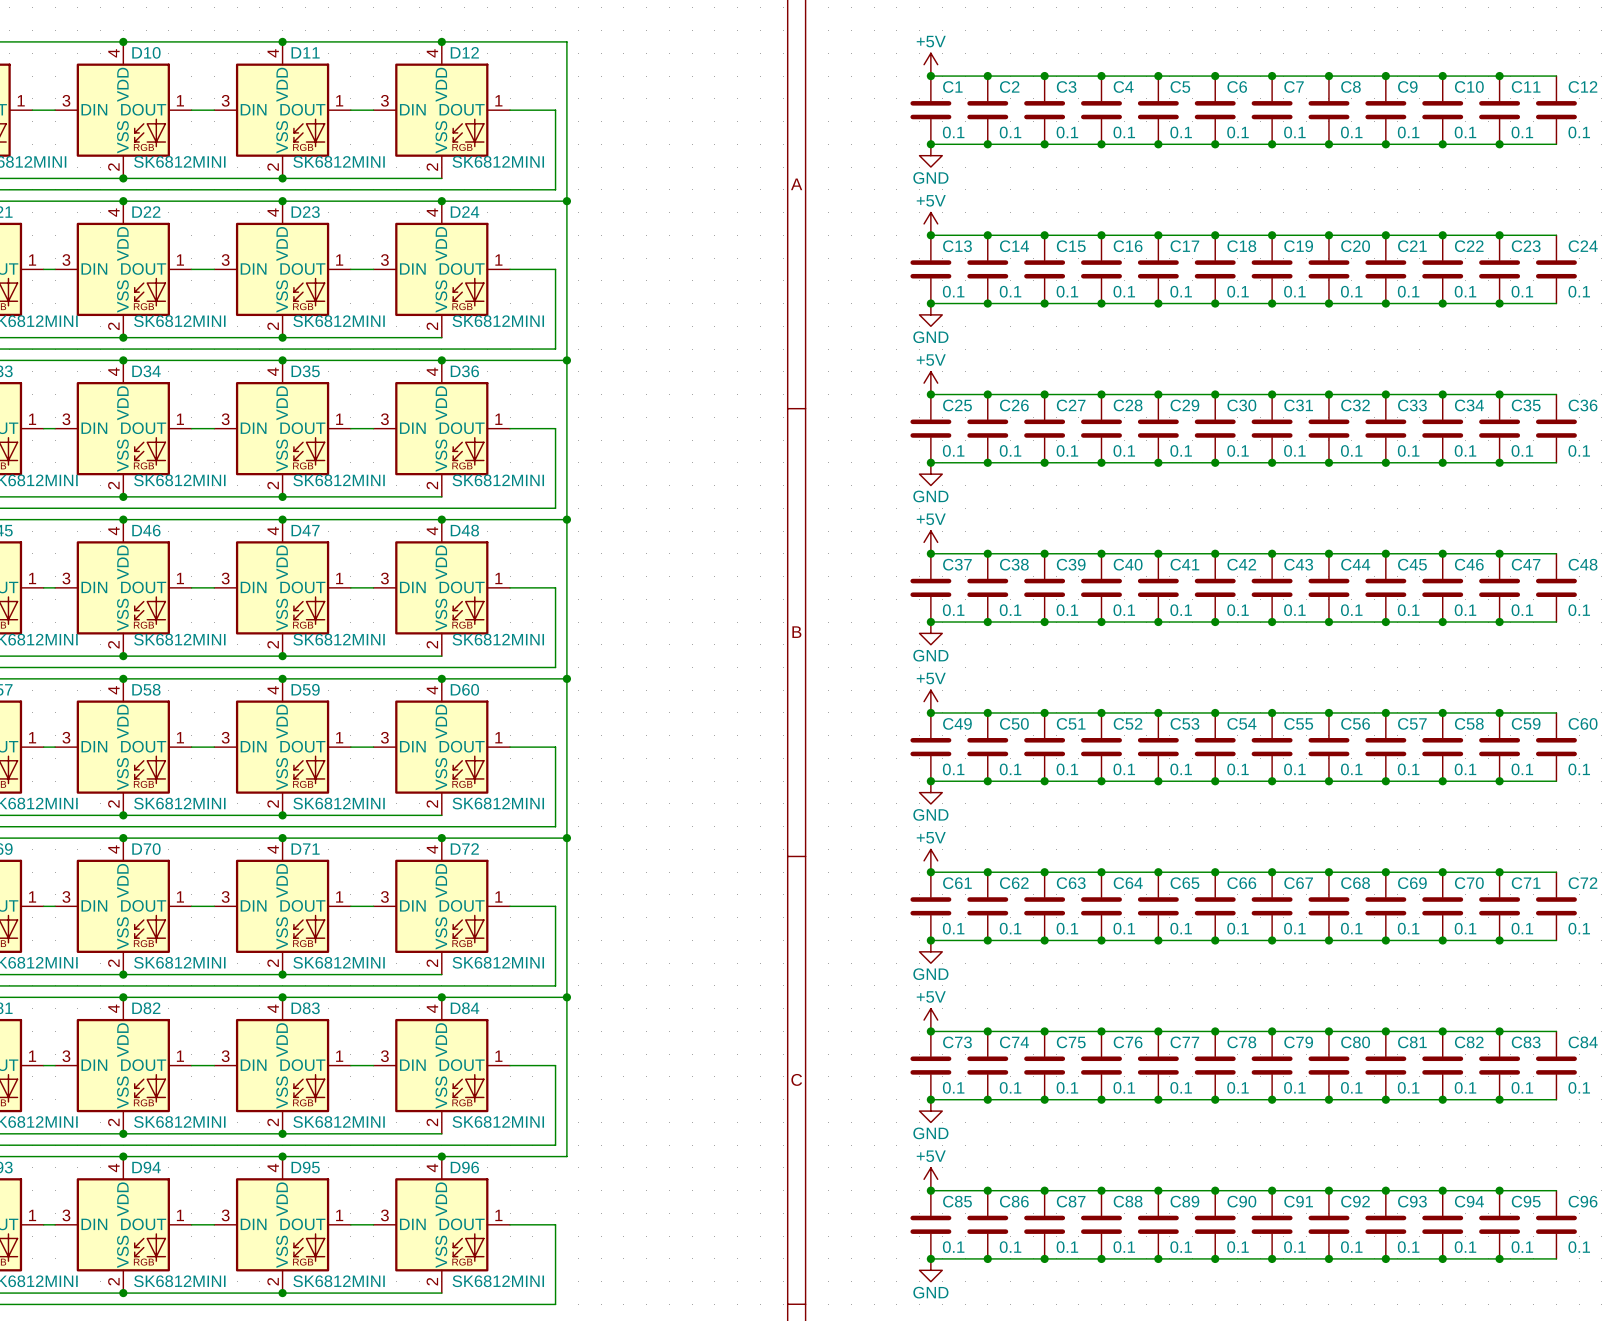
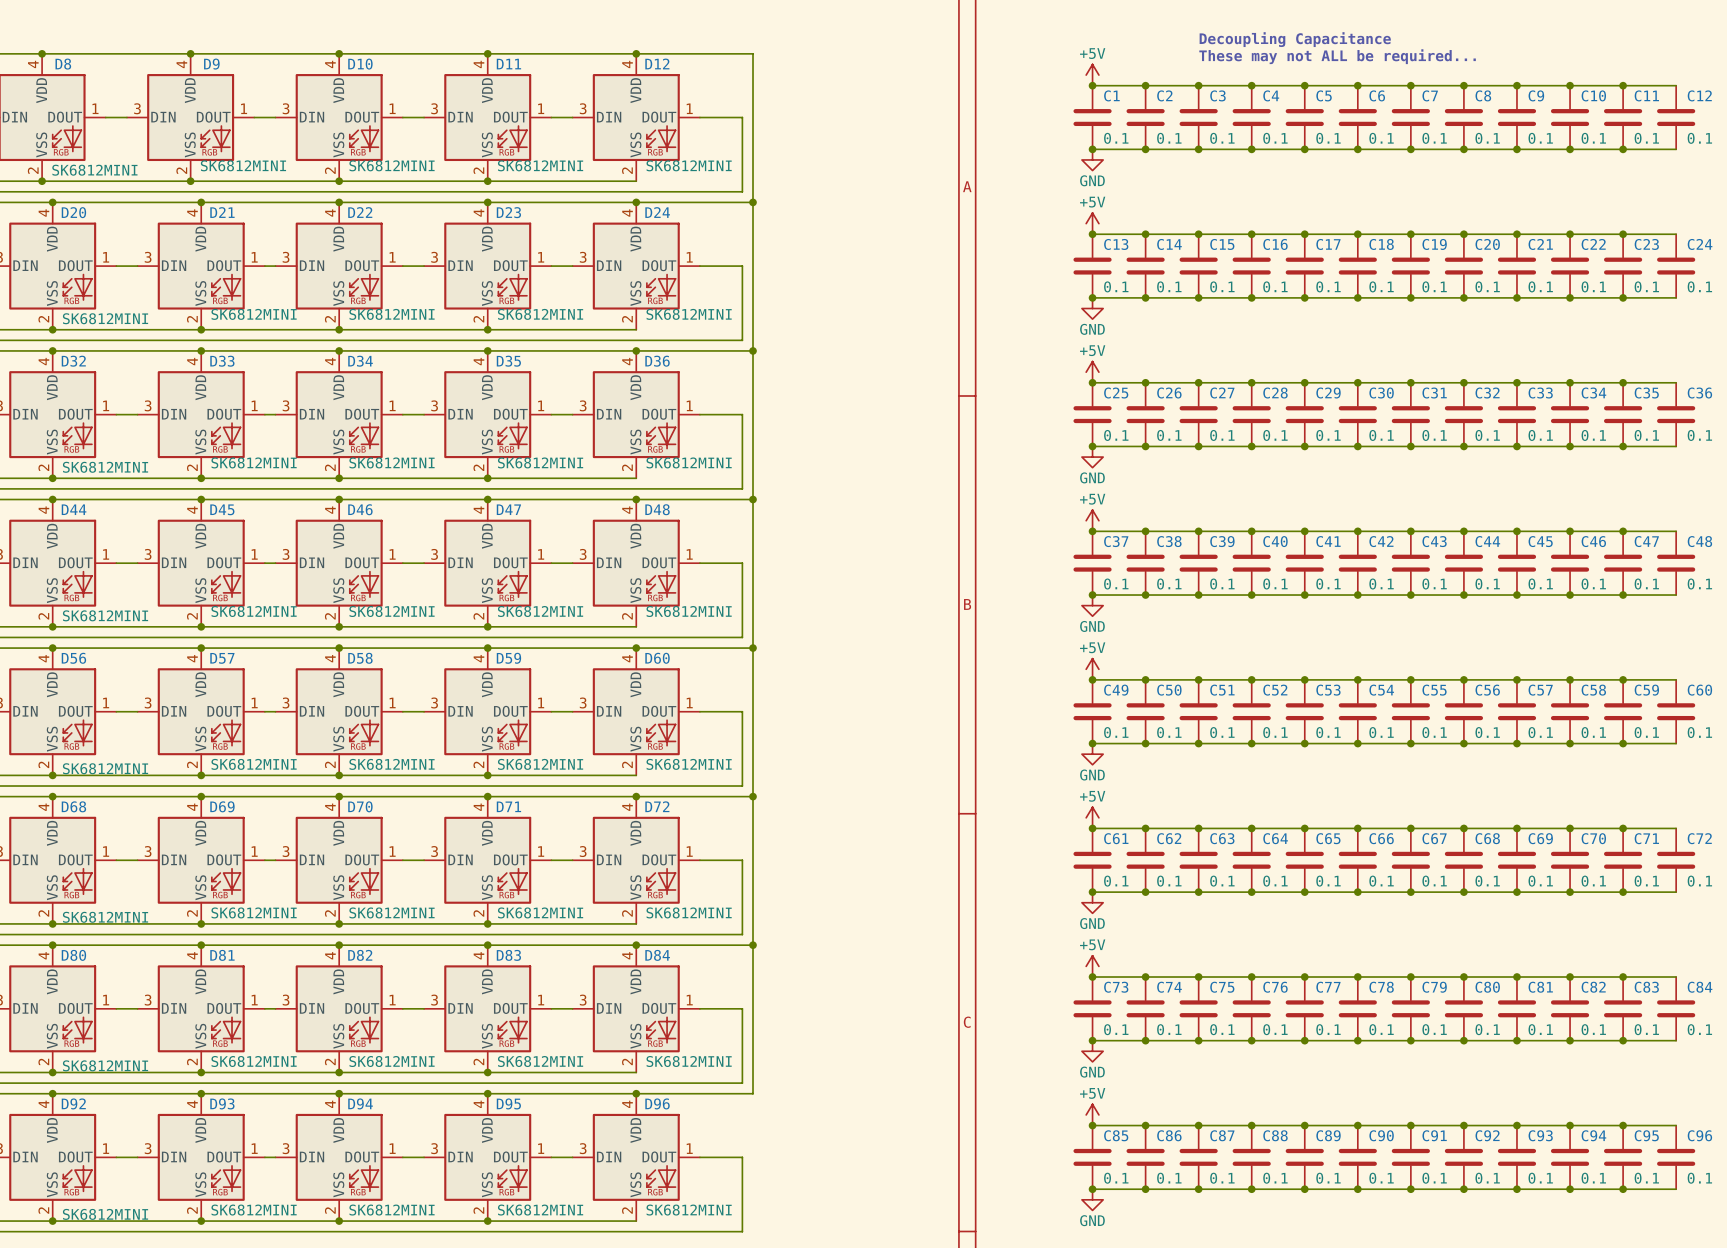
text: none -> Decoupling Capacitance (1295, 39)
text: none -> These may not ALL be required... (1337, 56)

